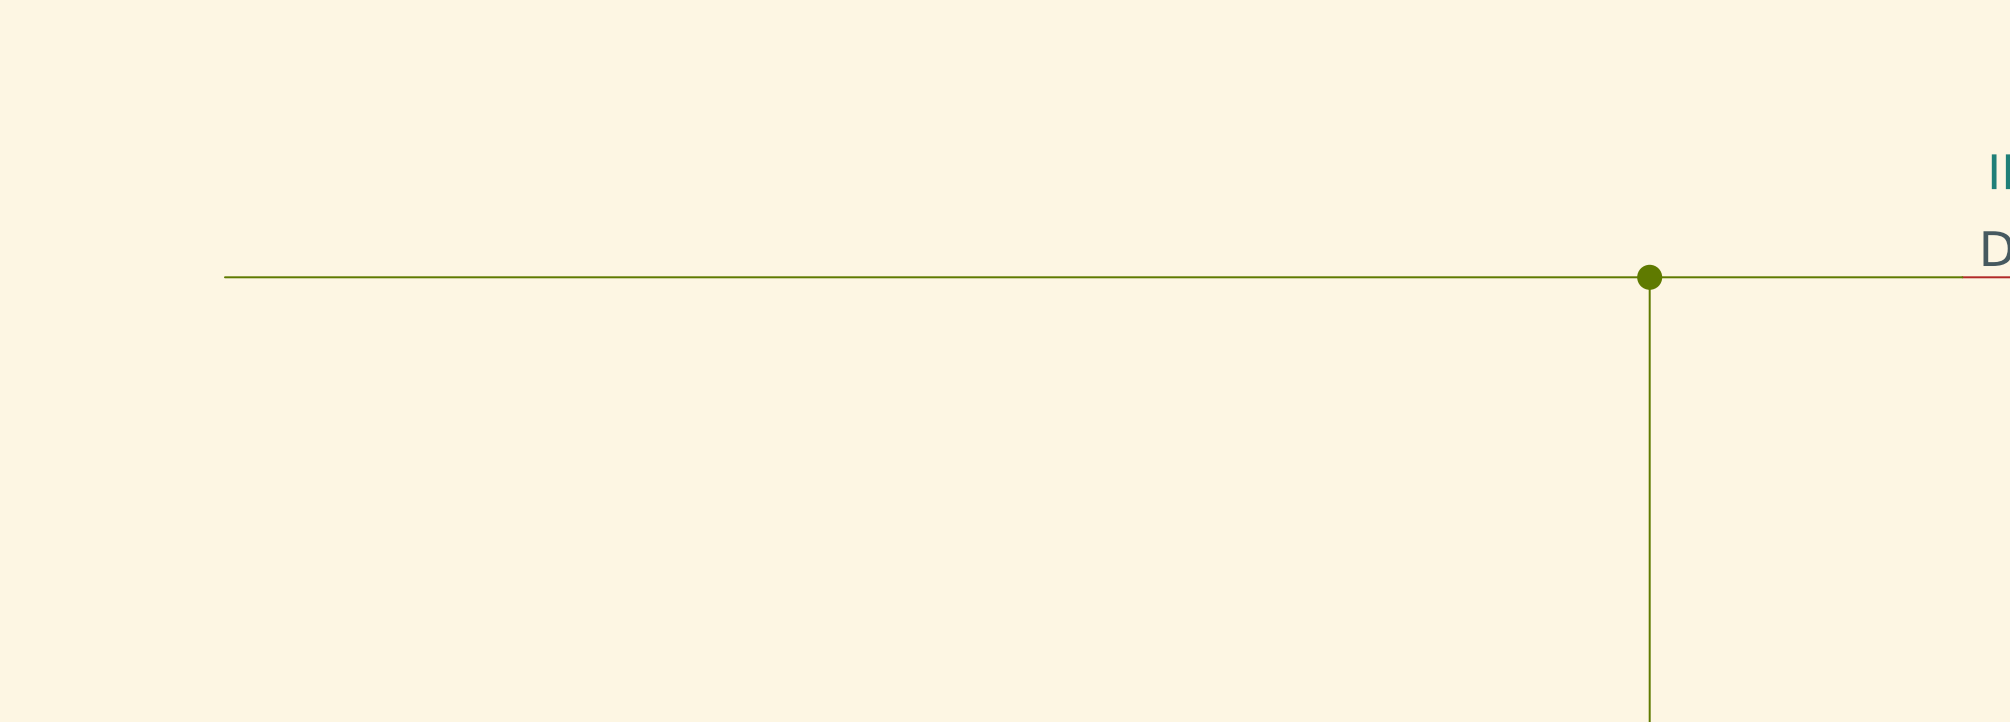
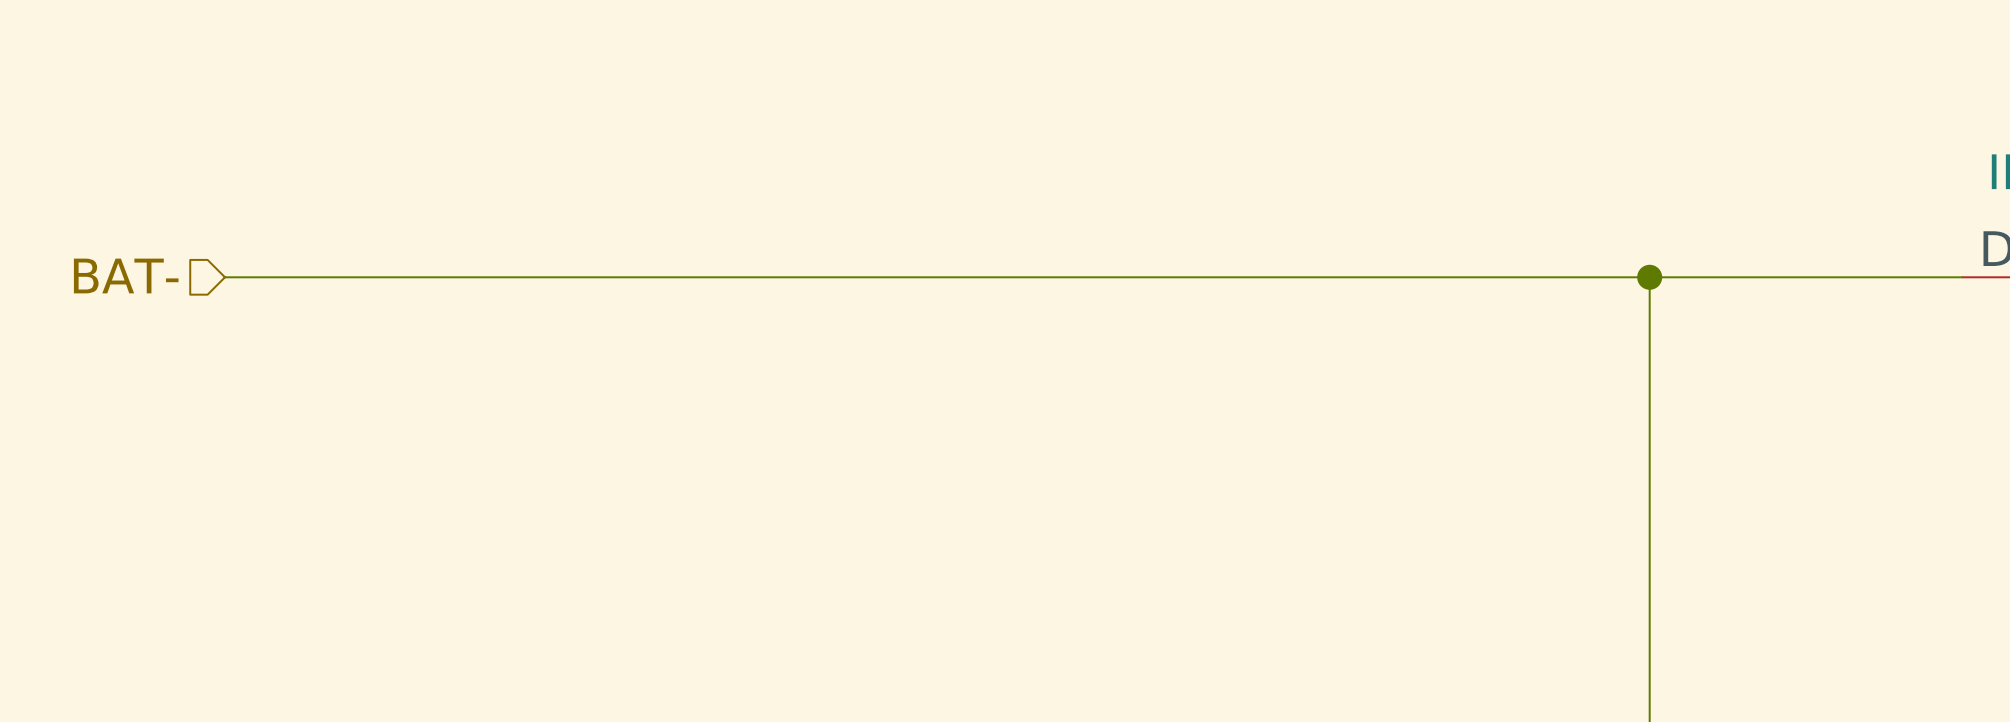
hierarchical label: none -> BAT- (126, 275)

